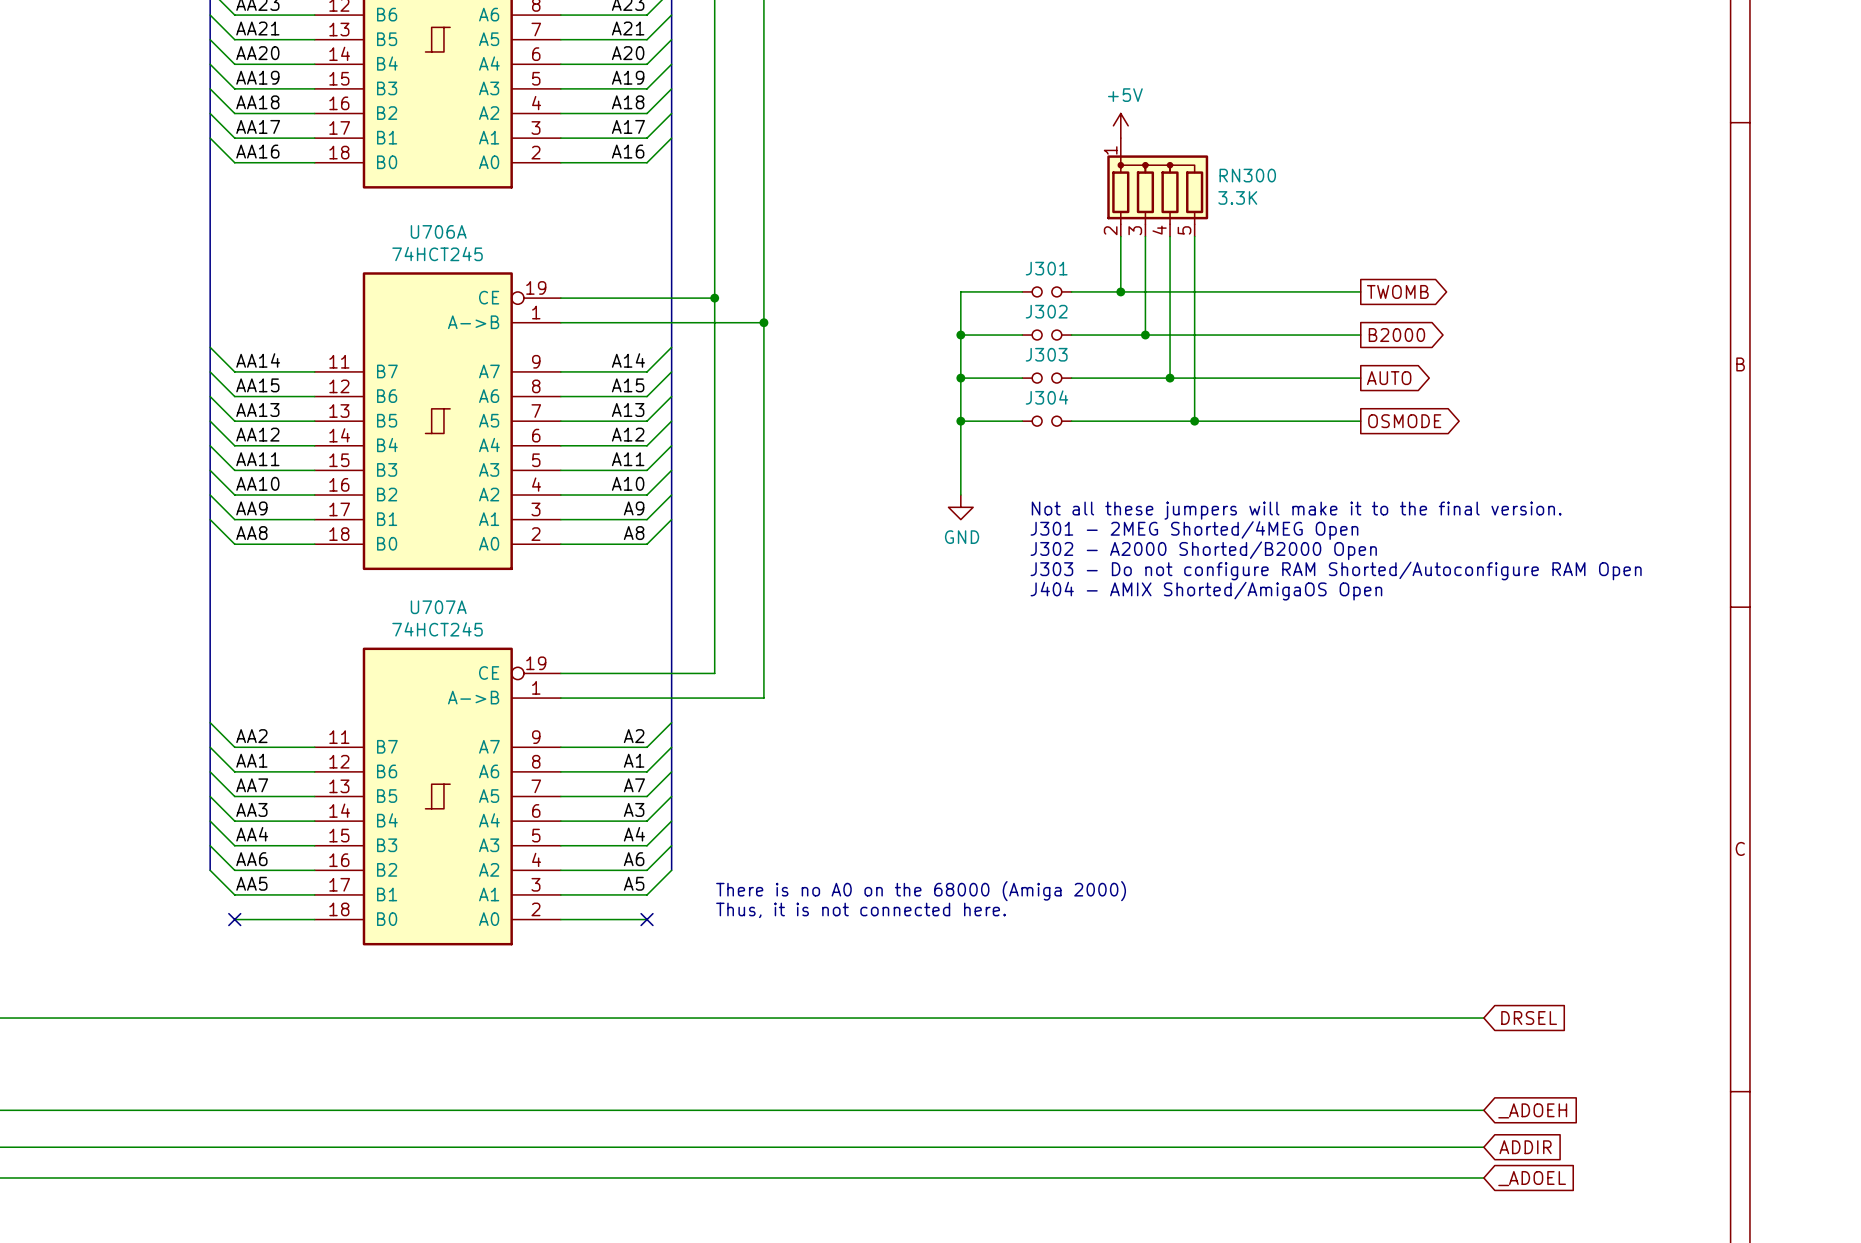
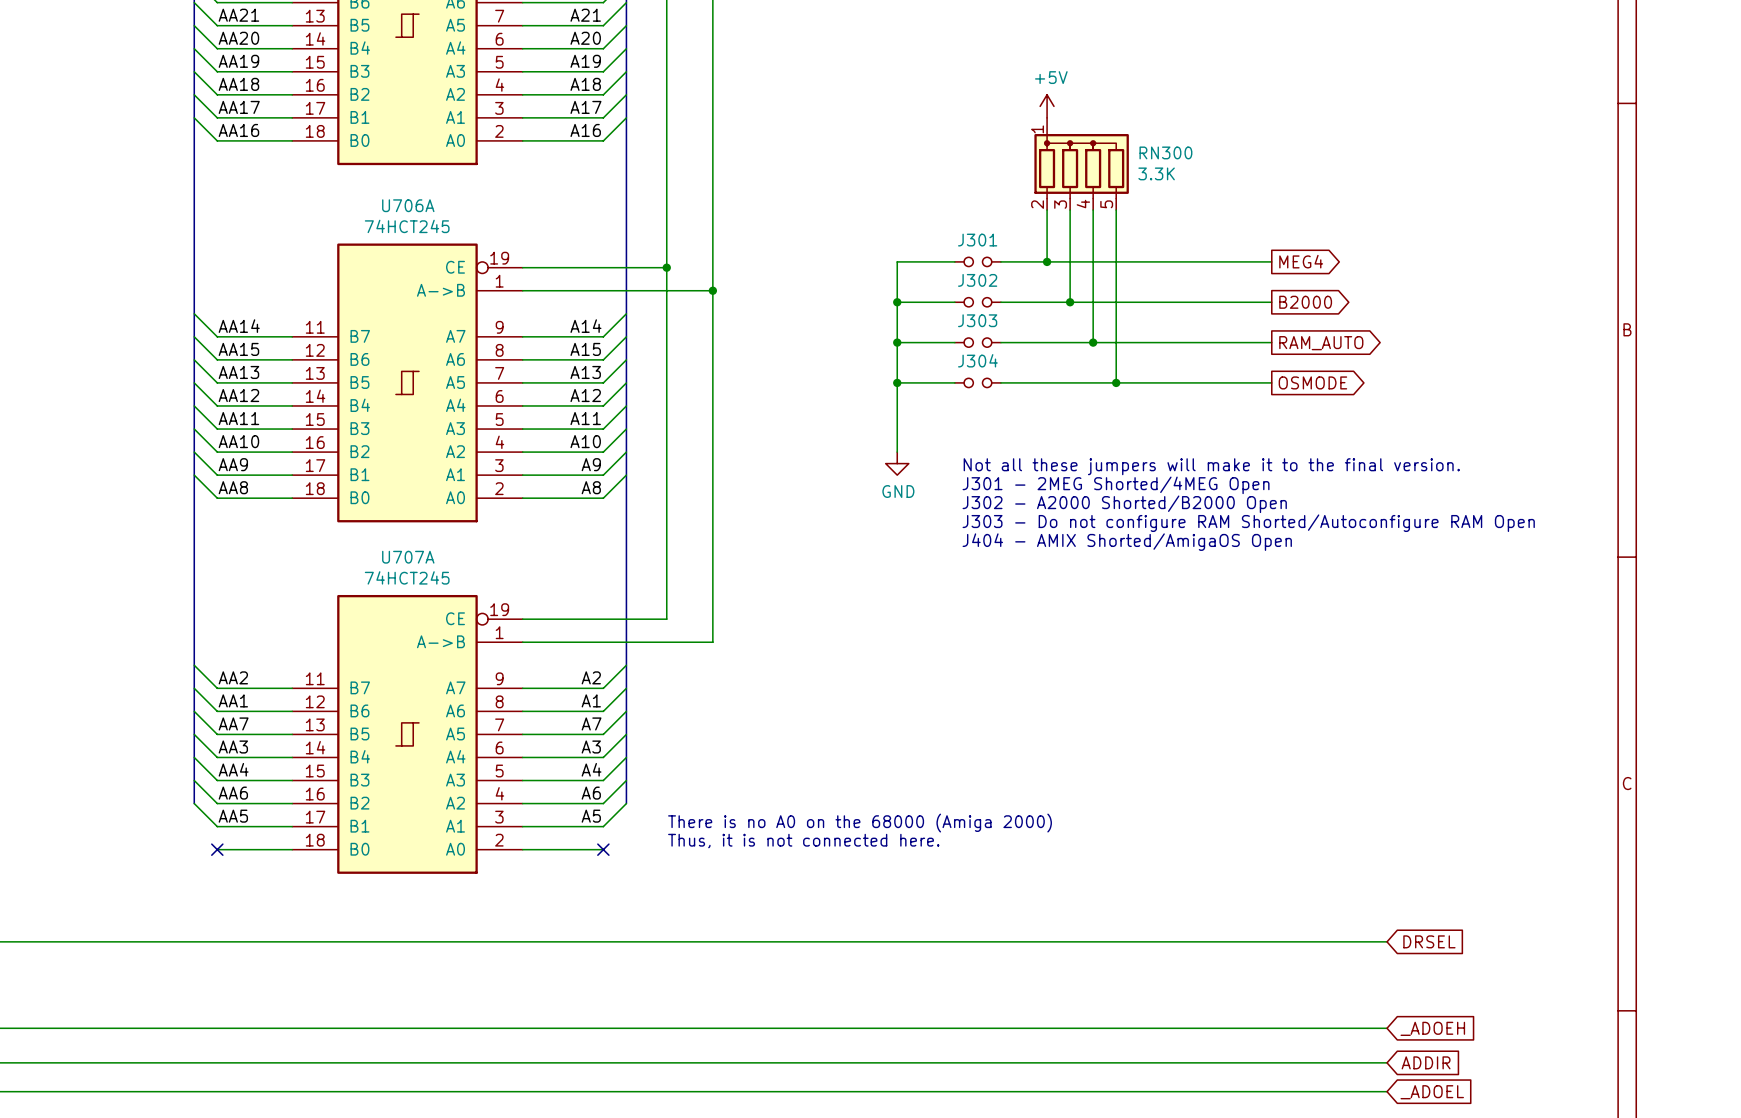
global label: TWOMB (1397, 291) -> MEG4 (1301, 261)
global label: AUTO (1389, 378) -> RAM_AUTO (1321, 343)

